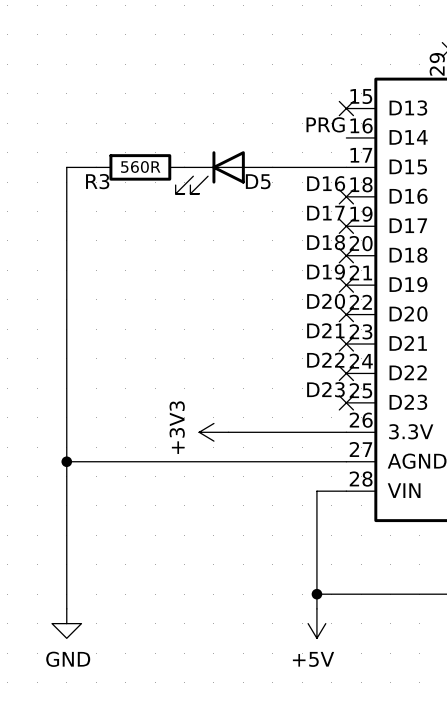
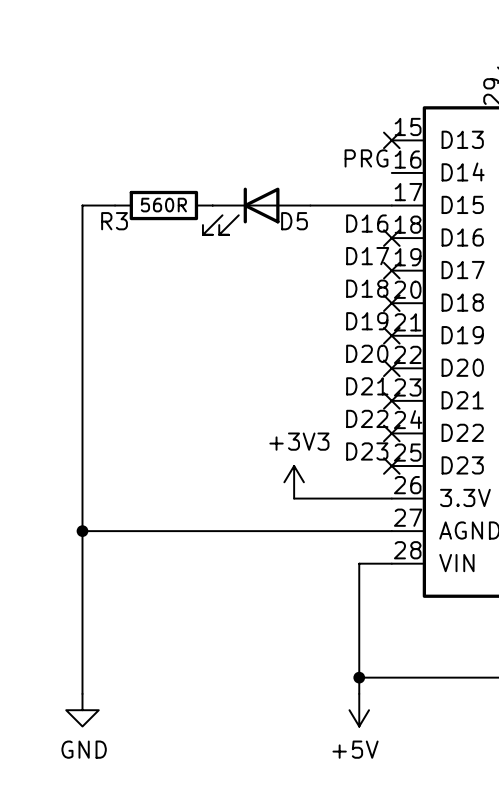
power symbol rotation: 0° (213, 432) -> 90° clockwise (294, 482)
power symbol position: +3V3 (213, 432) -> +3V3 (294, 482)
wire: (228, 432) (258, 432) -> none

